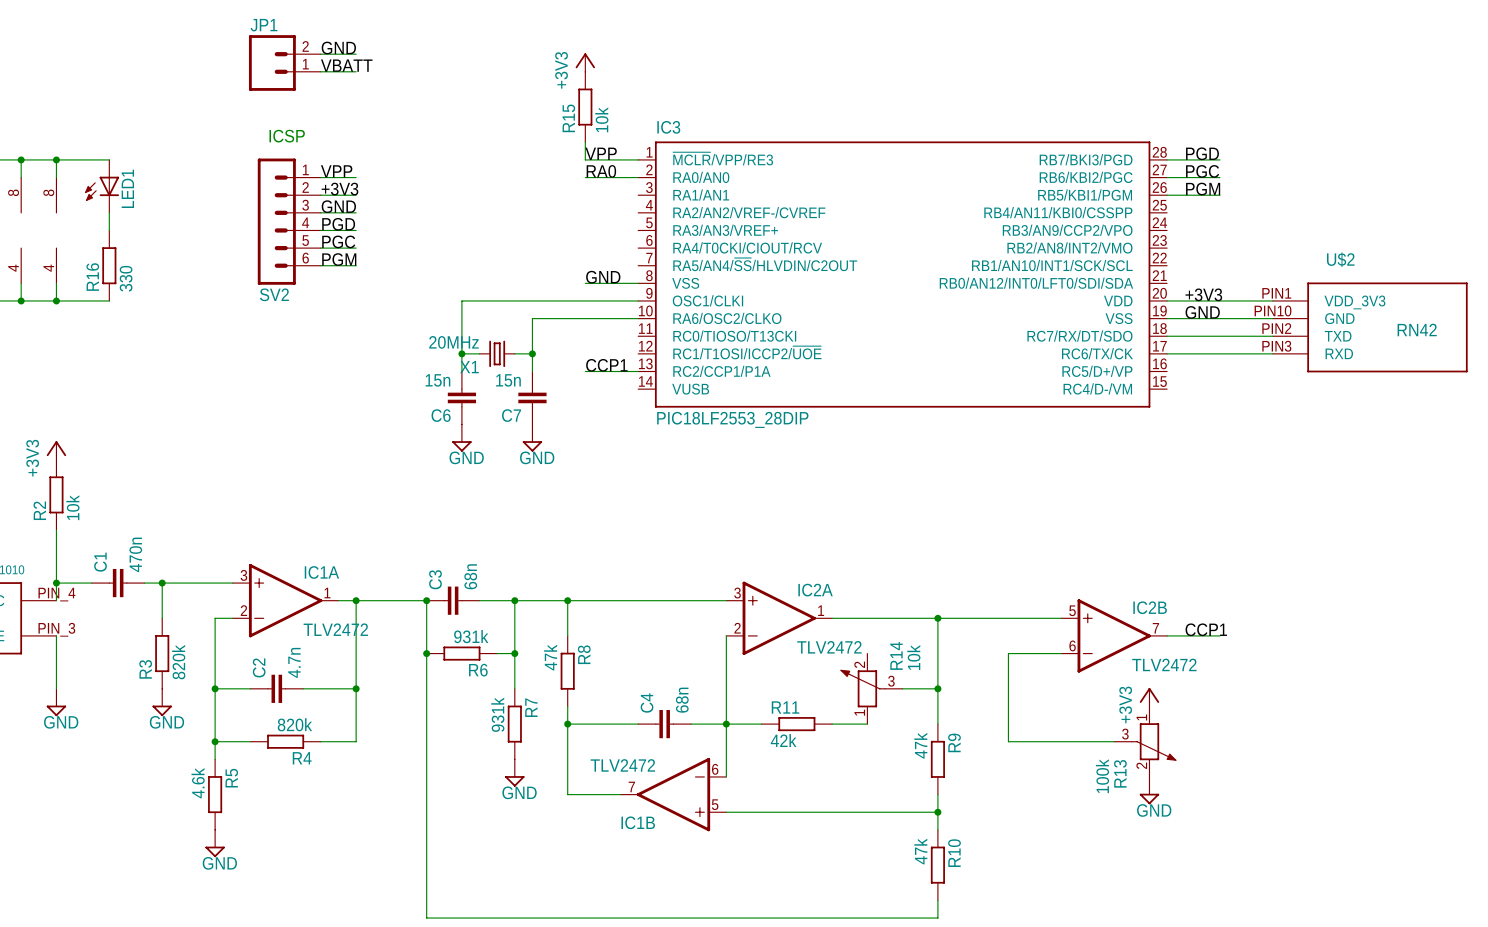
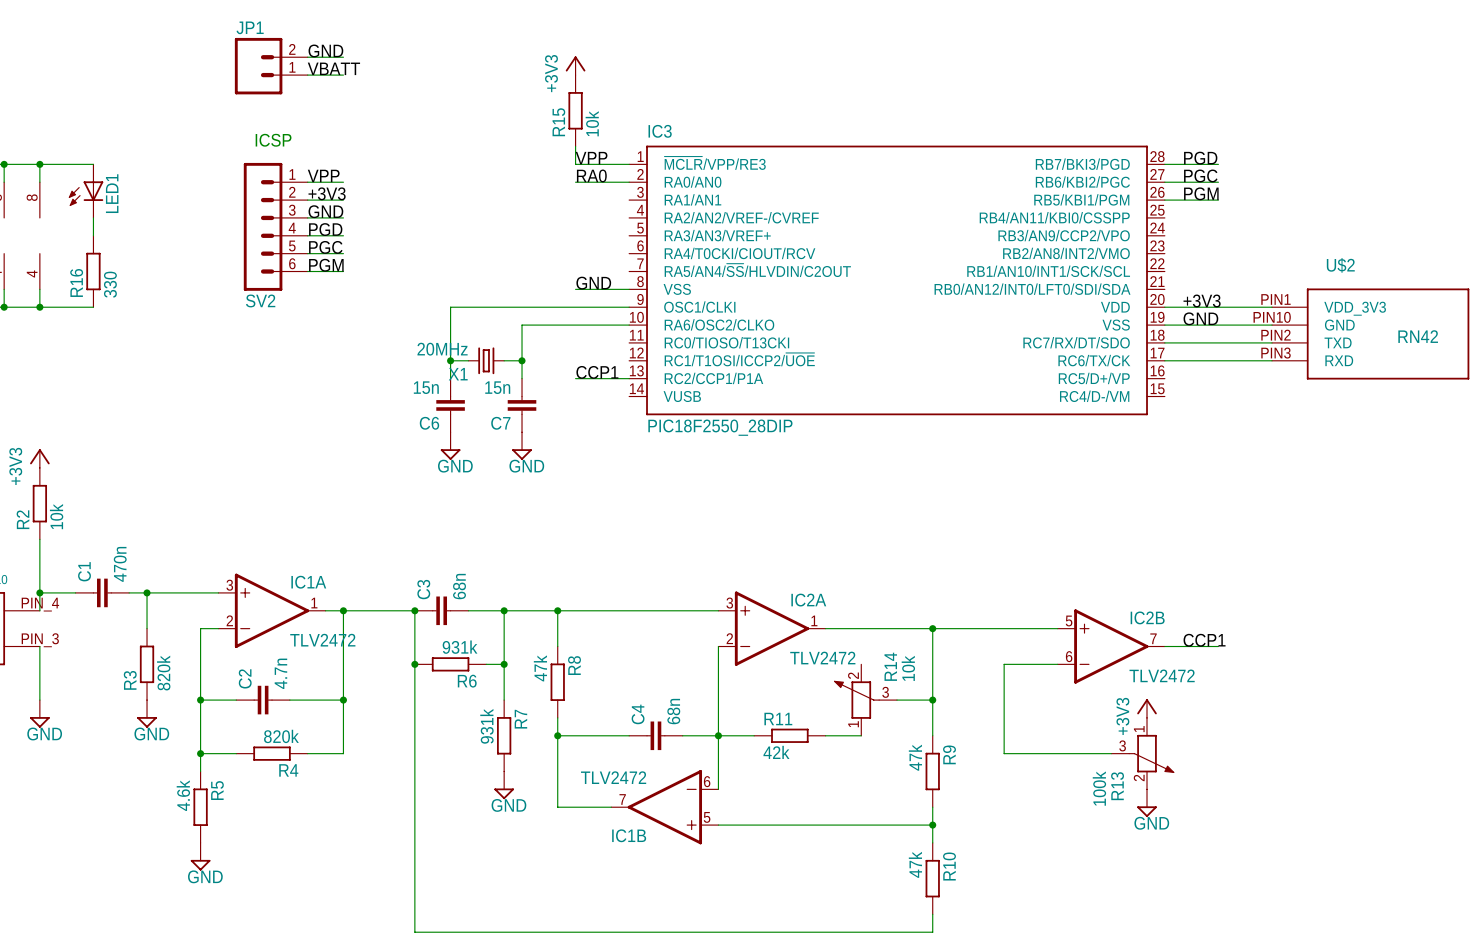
IC3 value: PIC18LF2553_28DIP (732, 419) -> PIC18F2550_28DIP (720, 427)

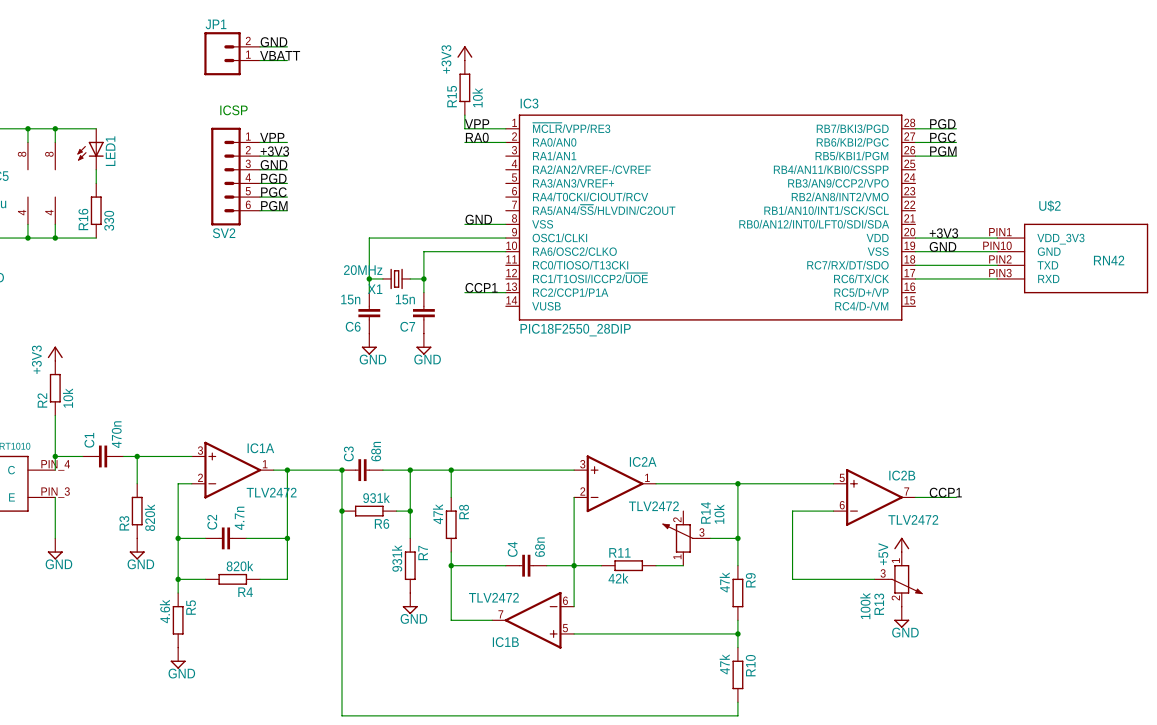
power symbol: +3V3 (1147, 708) -> +5V (901, 544)

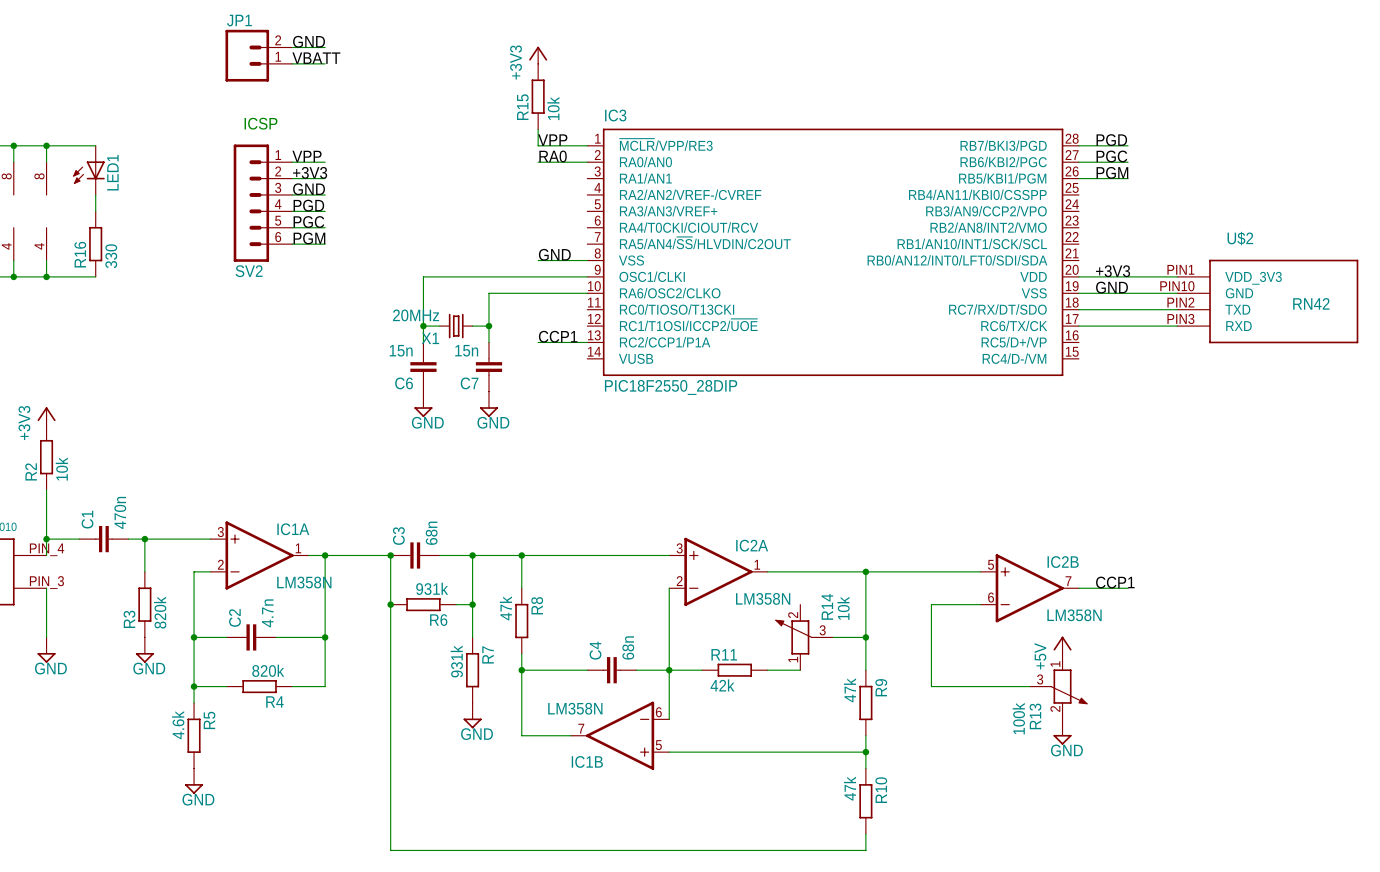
IC1A value: TLV2472 (271, 492) -> LM358N (304, 582)
IC2A value: TLV2472 (653, 506) -> LM358N (763, 598)
IC2B value: TLV2472 (913, 519) -> LM358N (1074, 615)
IC1B value: TLV2472 (493, 597) -> LM358N (575, 708)

